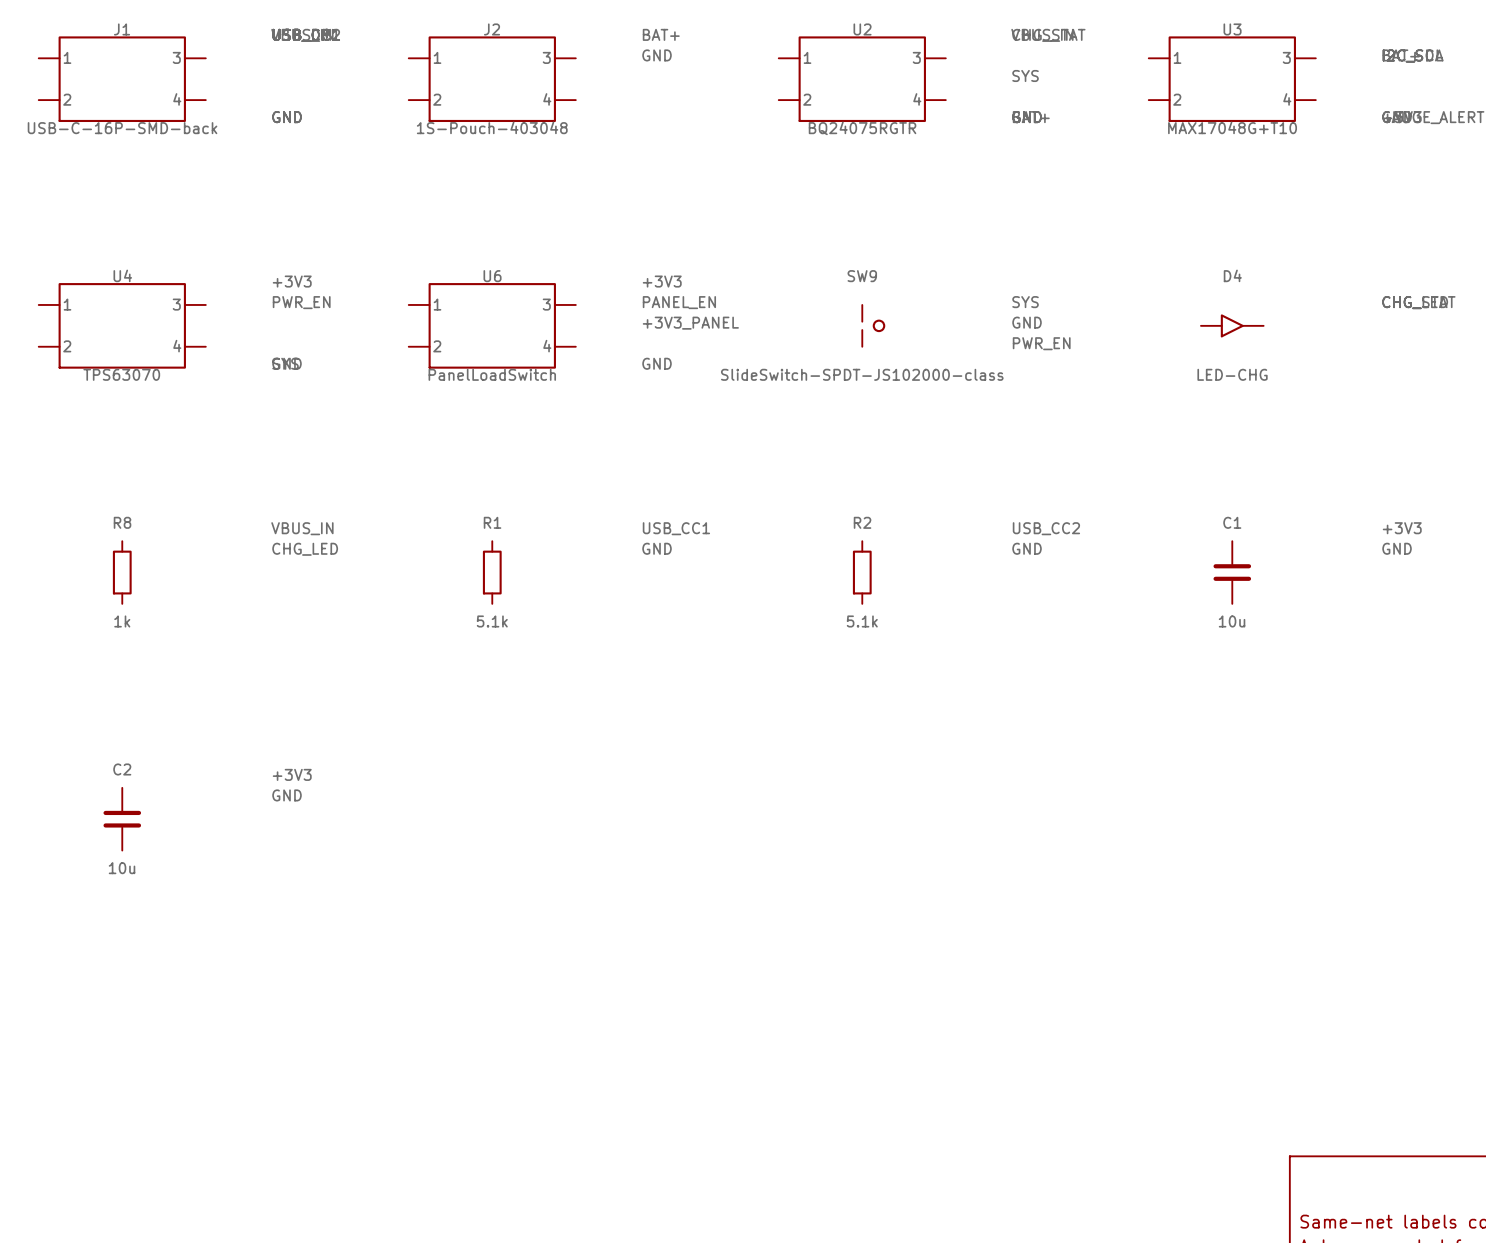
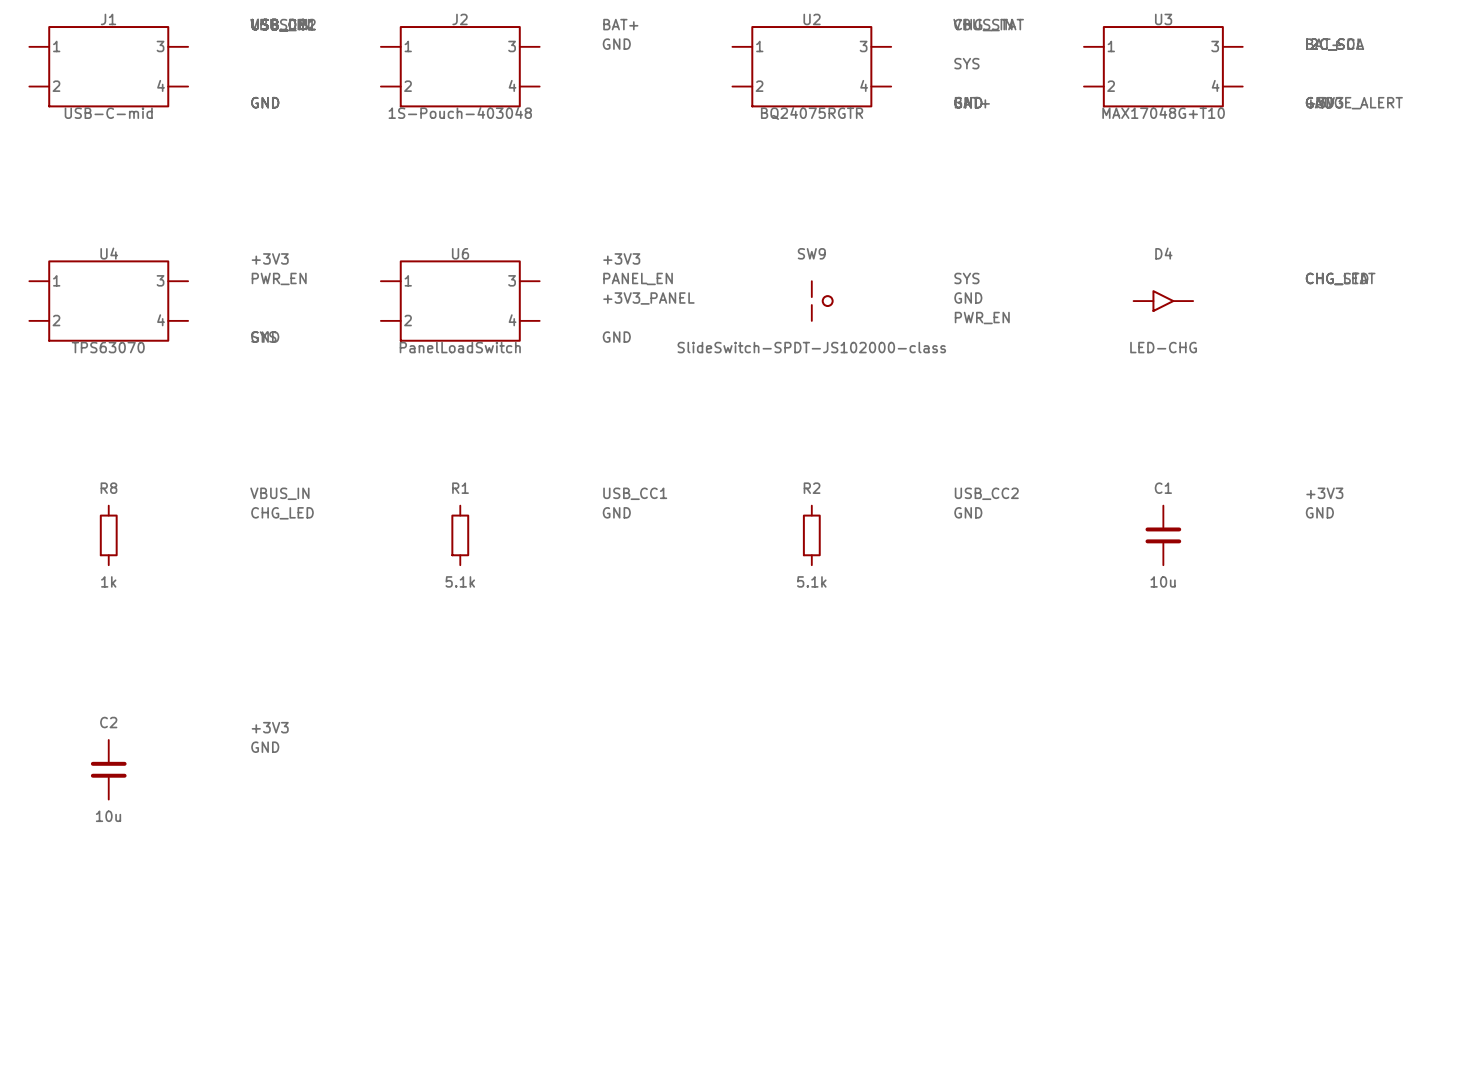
J1 value: USB-C-16P-SMD-back (122, 128) -> USB-C-mid (108, 113)

